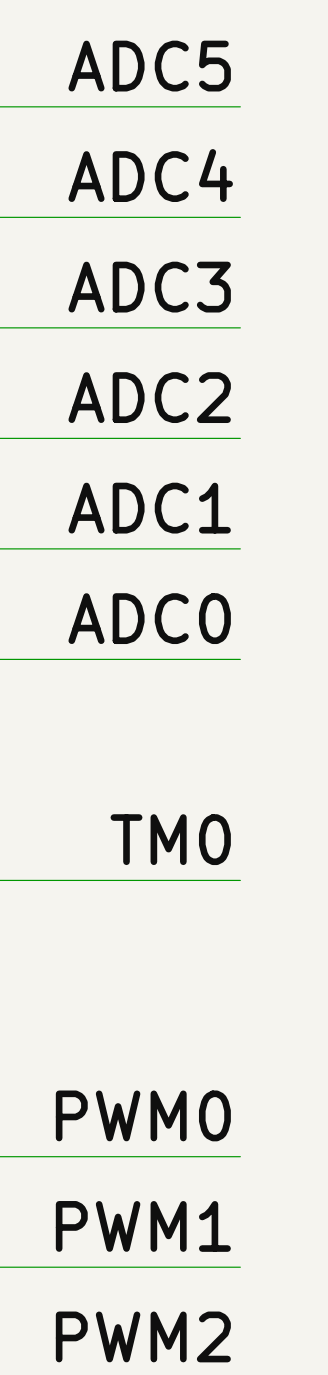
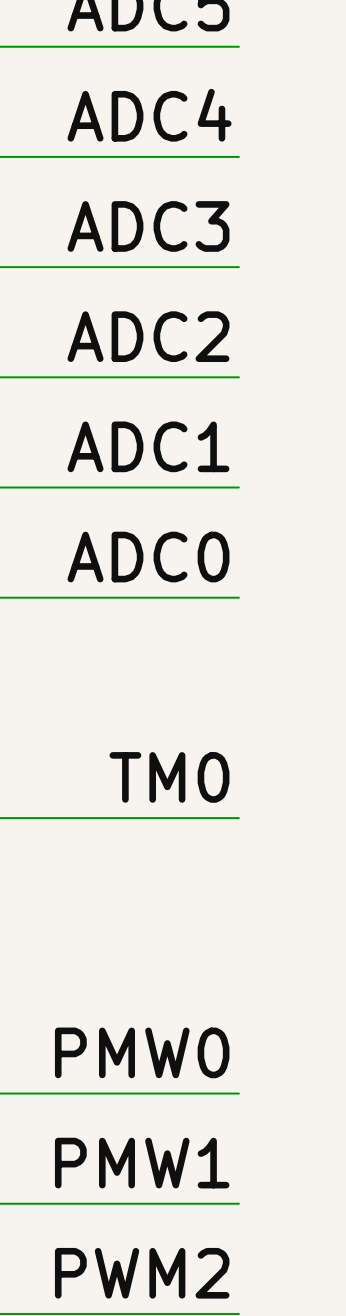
label: PWM0 (143, 1115) -> PMW0 (142, 1052)
label: PWM1 (143, 1226) -> PMW1 (142, 1163)

